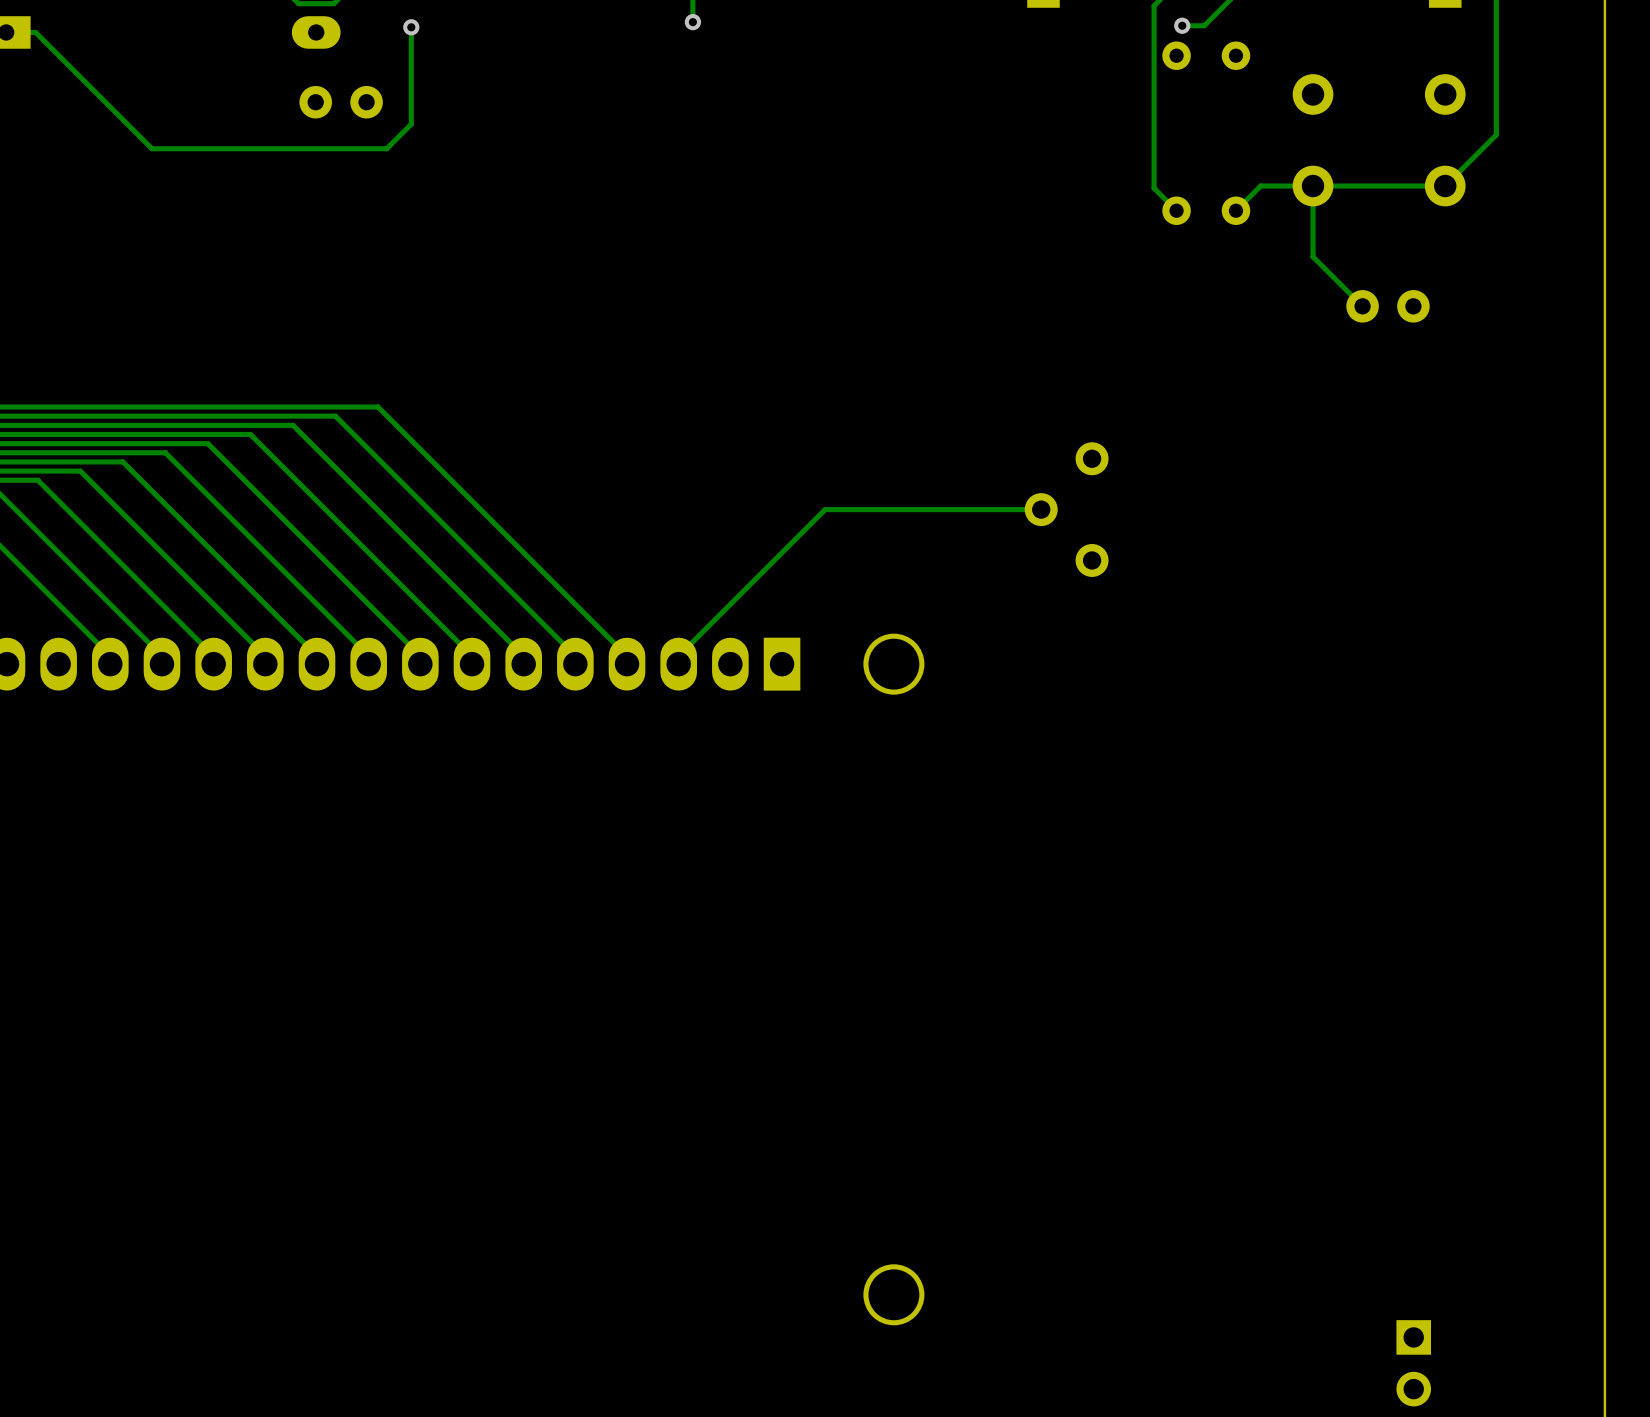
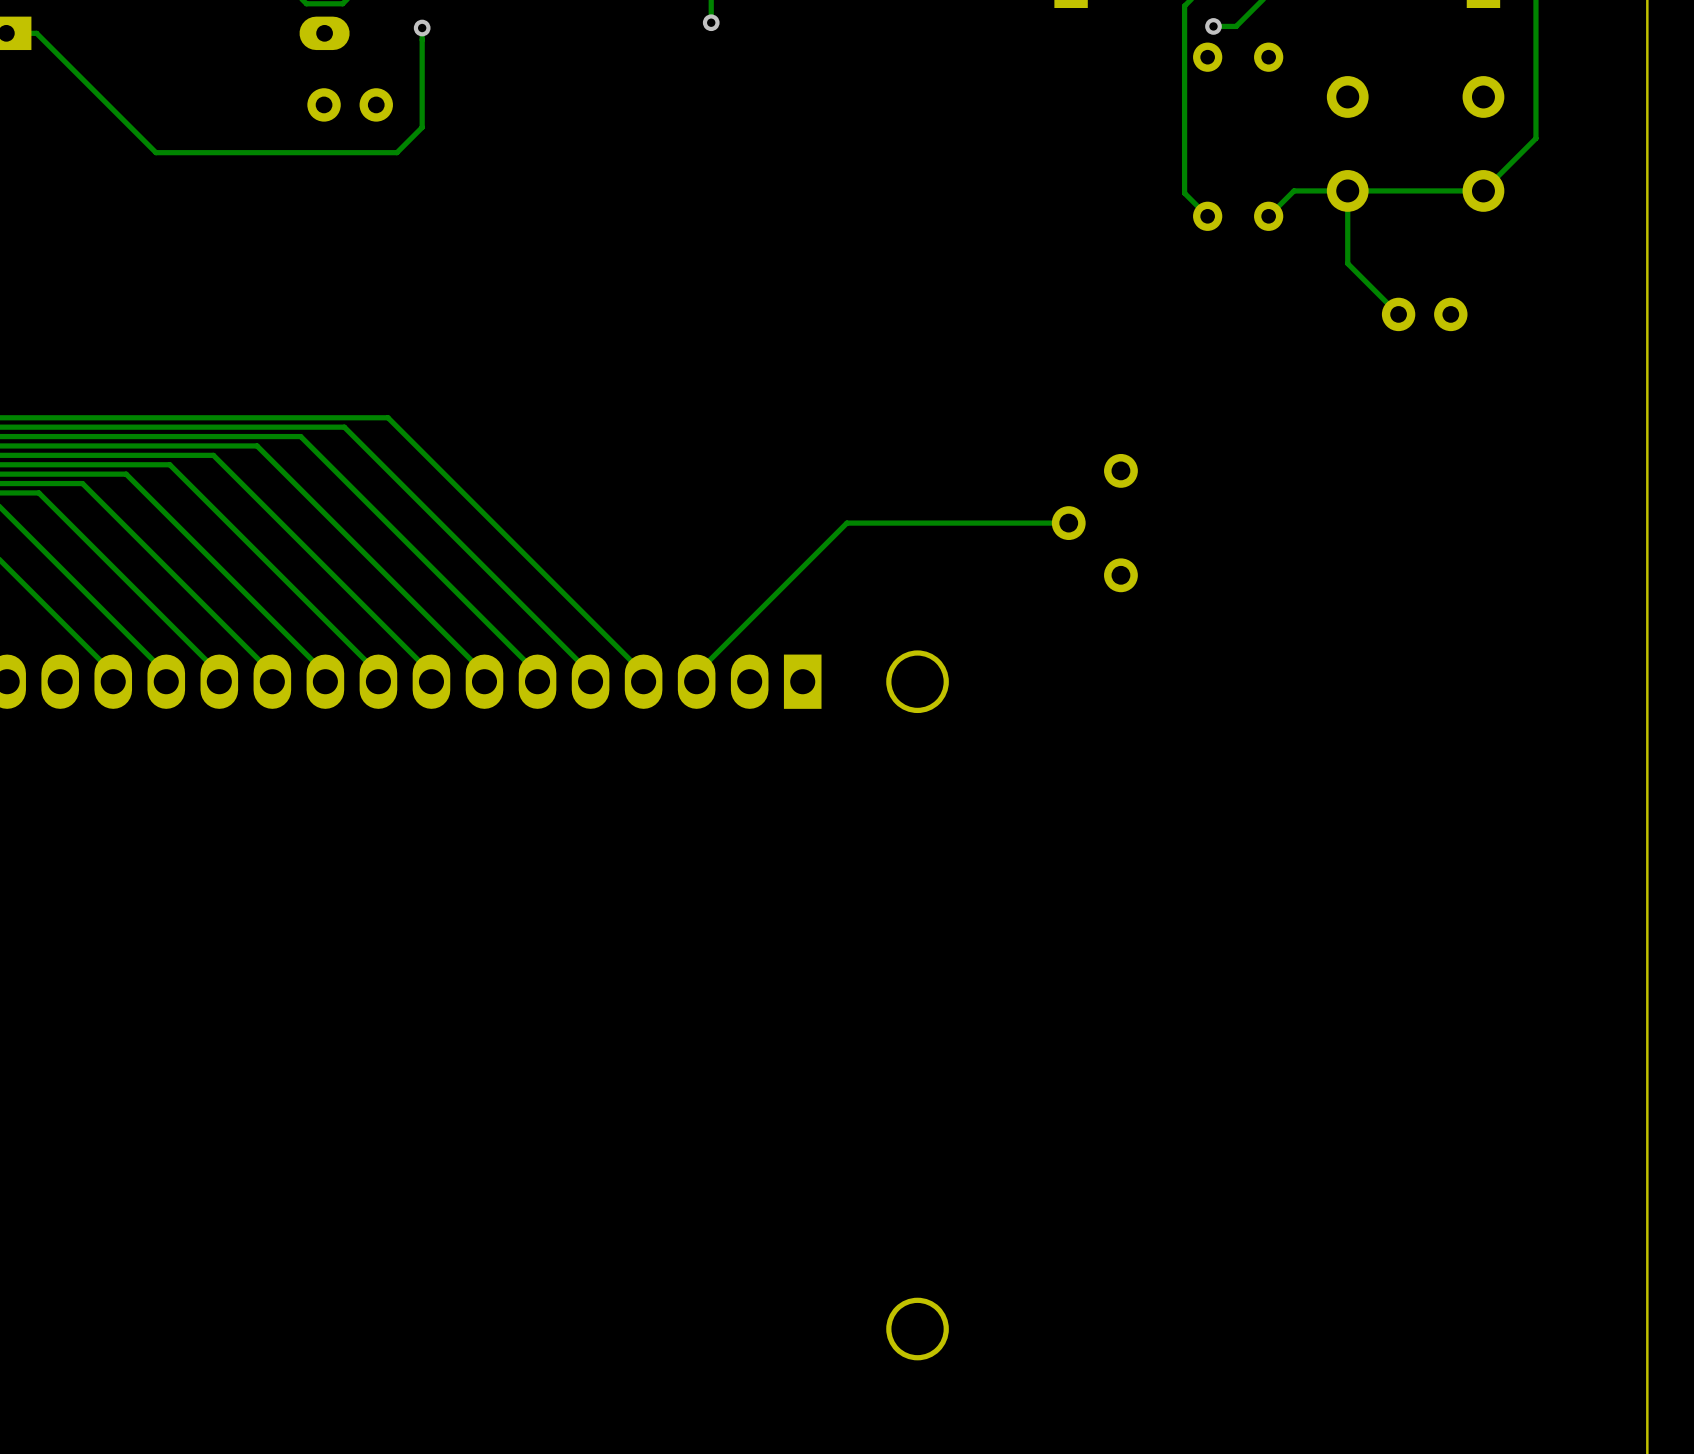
part: (1413, 1363) -> none

